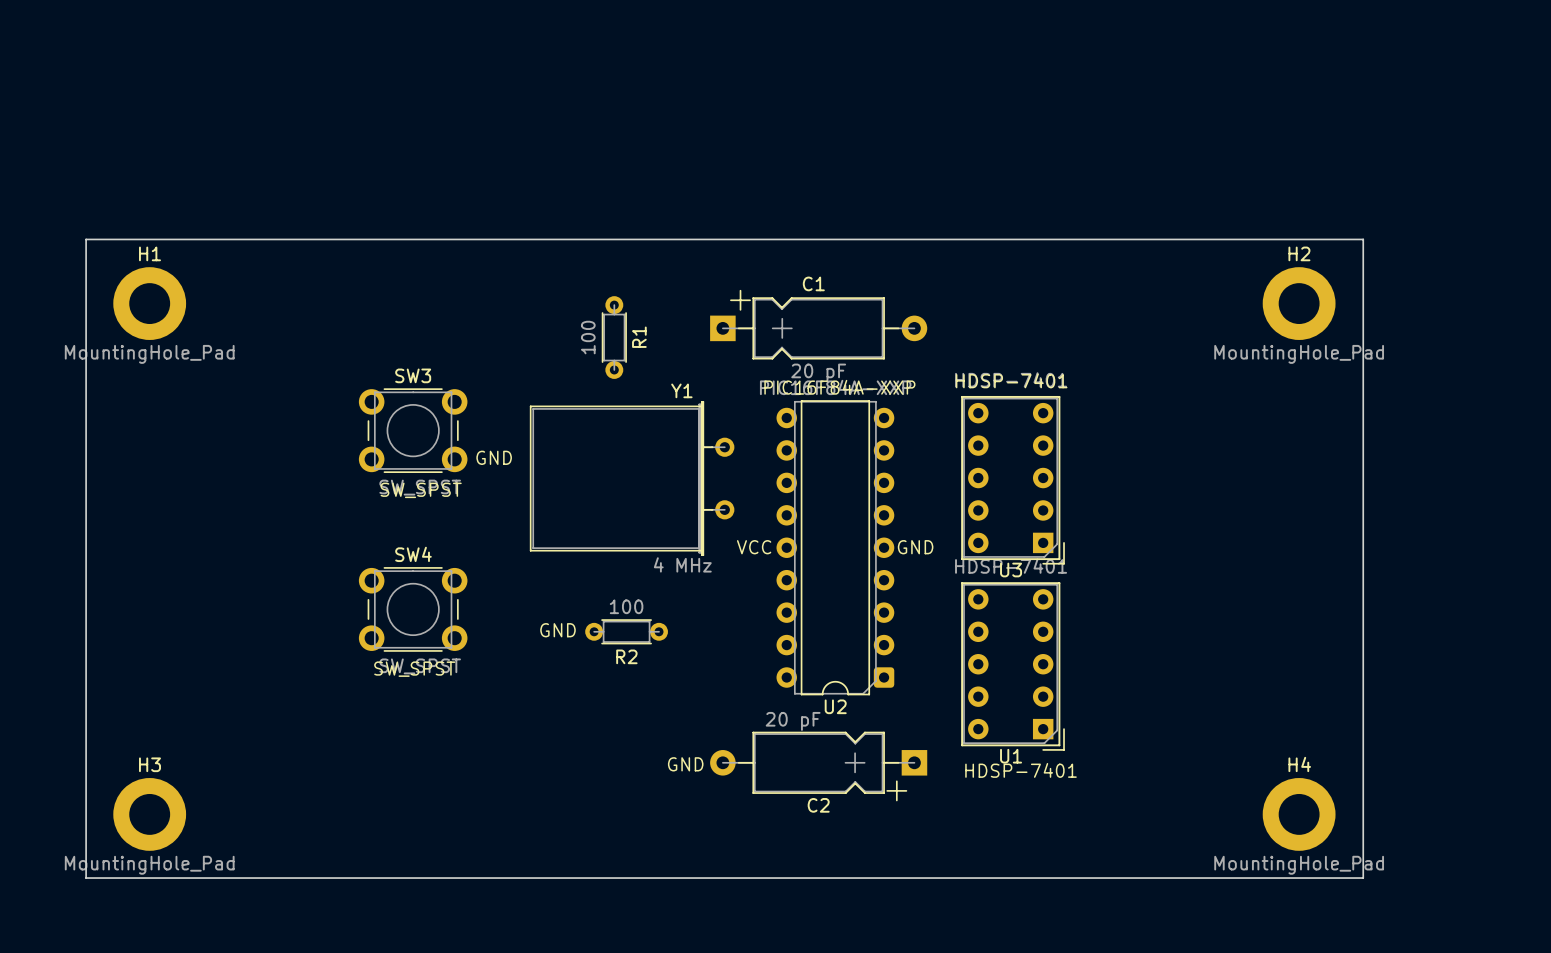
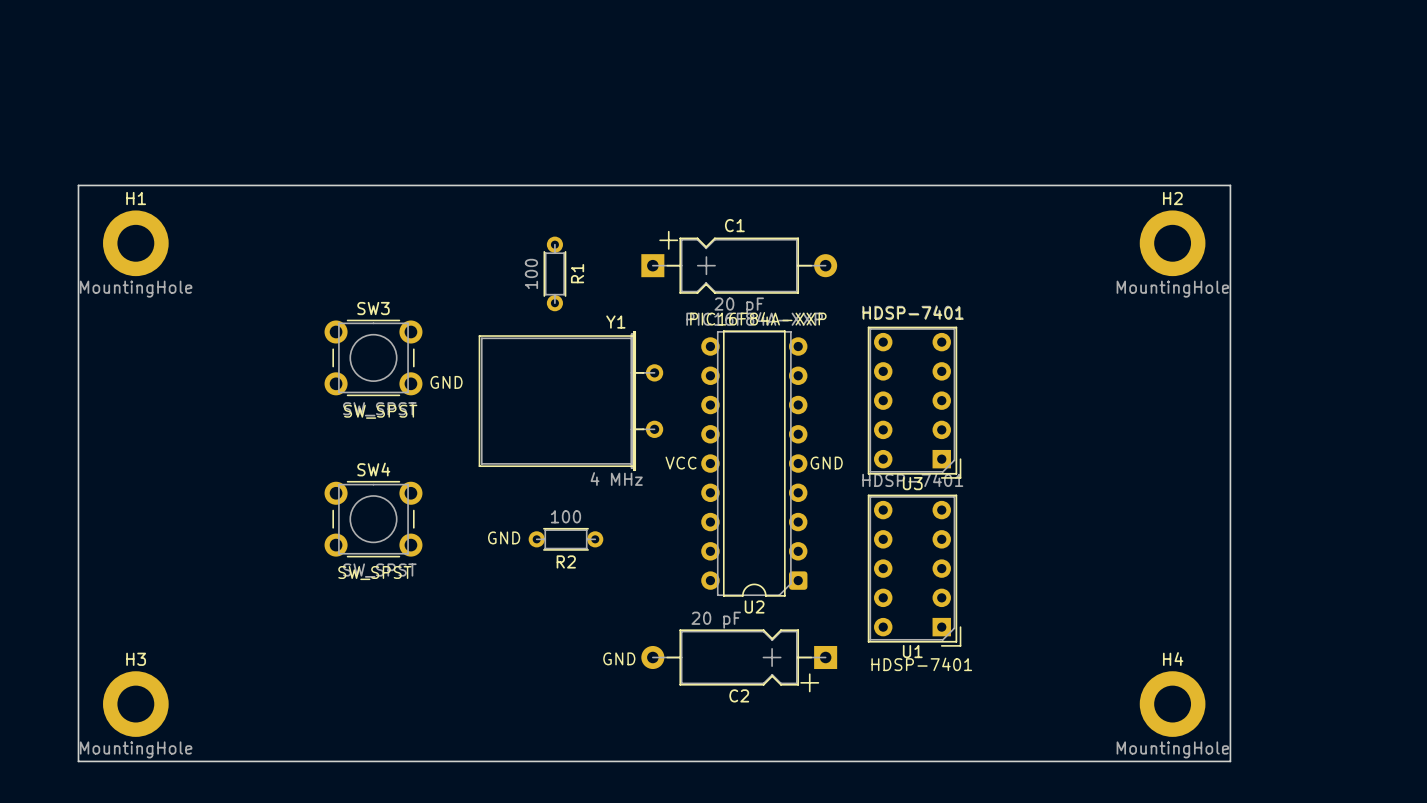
H1 value: MountingHole_Pad (149, 354) -> MountingHole (136, 289)
H2 value: MountingHole_Pad (1299, 354) -> MountingHole (1172, 289)
H3 value: MountingHole_Pad (149, 865) -> MountingHole (136, 749)
H4 value: MountingHole_Pad (1299, 865) -> MountingHole (1172, 749)

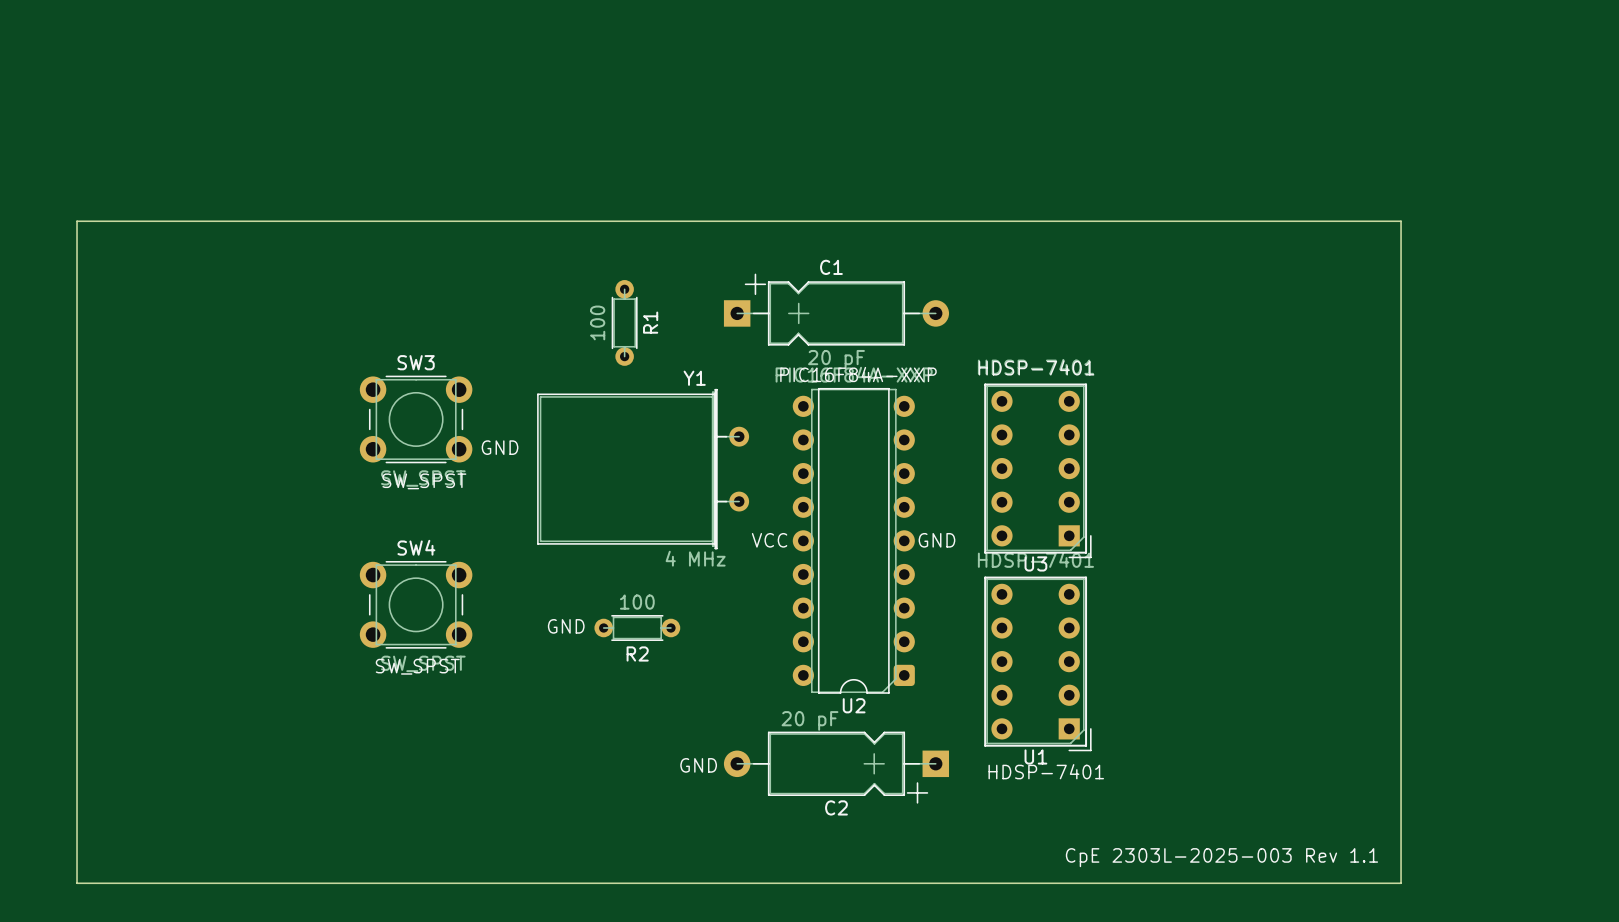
H1: MountingHole (135, 243) -> none
H2: MountingHole (1172, 243) -> none
H3: MountingHole (135, 704) -> none
H4: MountingHole (1172, 704) -> none
text: none -> CpE 2303L-2025-003 Rev 1.1 (1221, 857)

